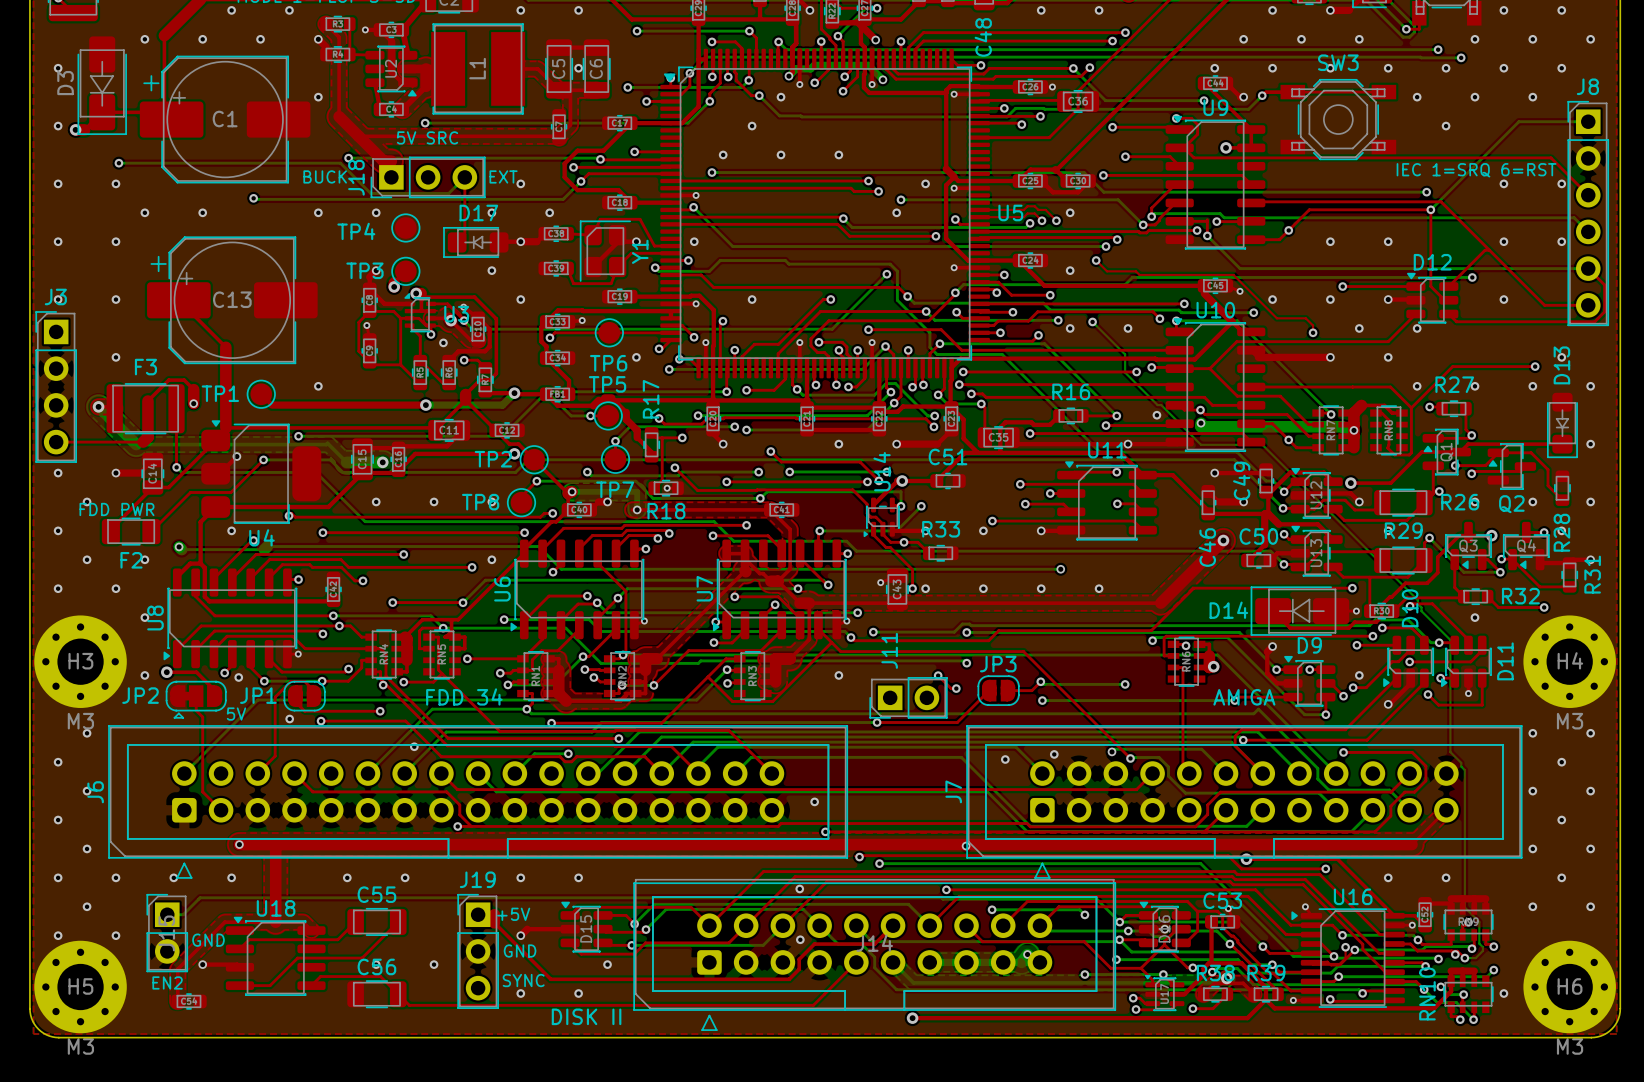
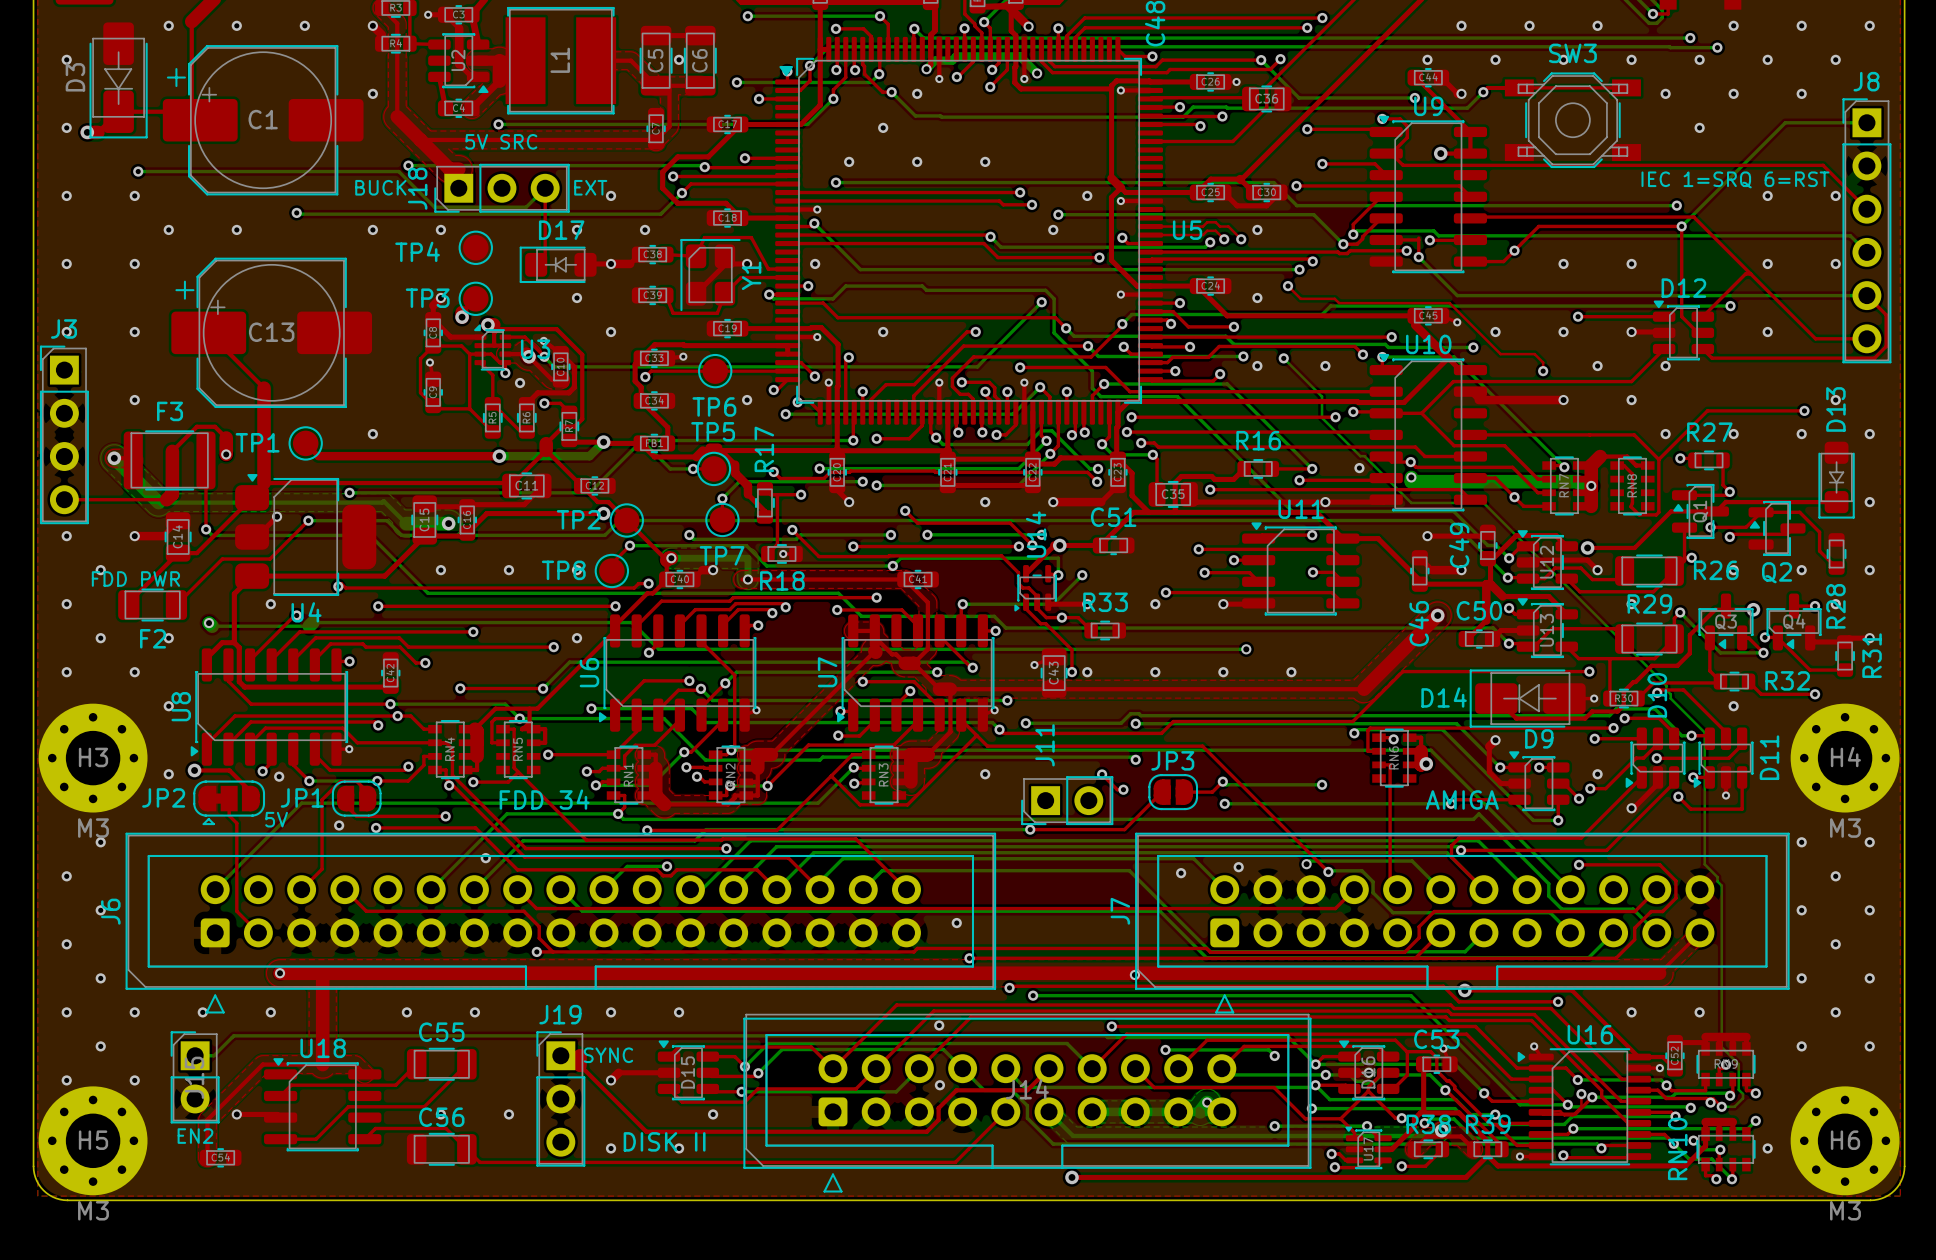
text: +5V (513, 914) -> SYNC (608, 1055)
text: GND (208, 940) -> none
text: GND (520, 951) -> none
text: SYNC (523, 980) -> none
text position: DISK II (586, 1016) -> DISK II (664, 1141)

